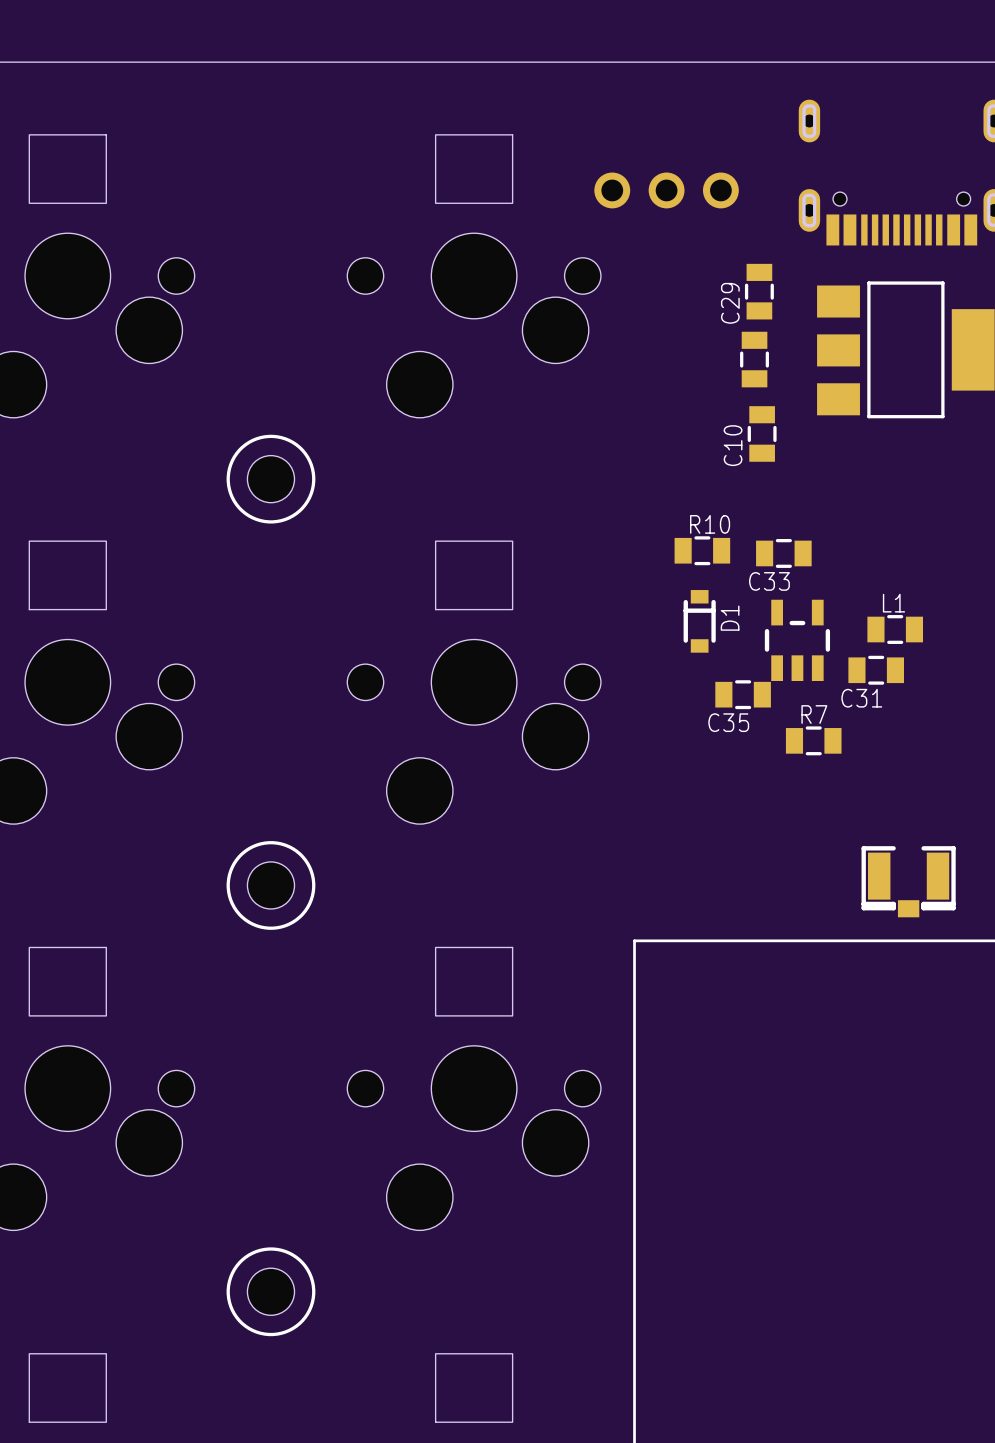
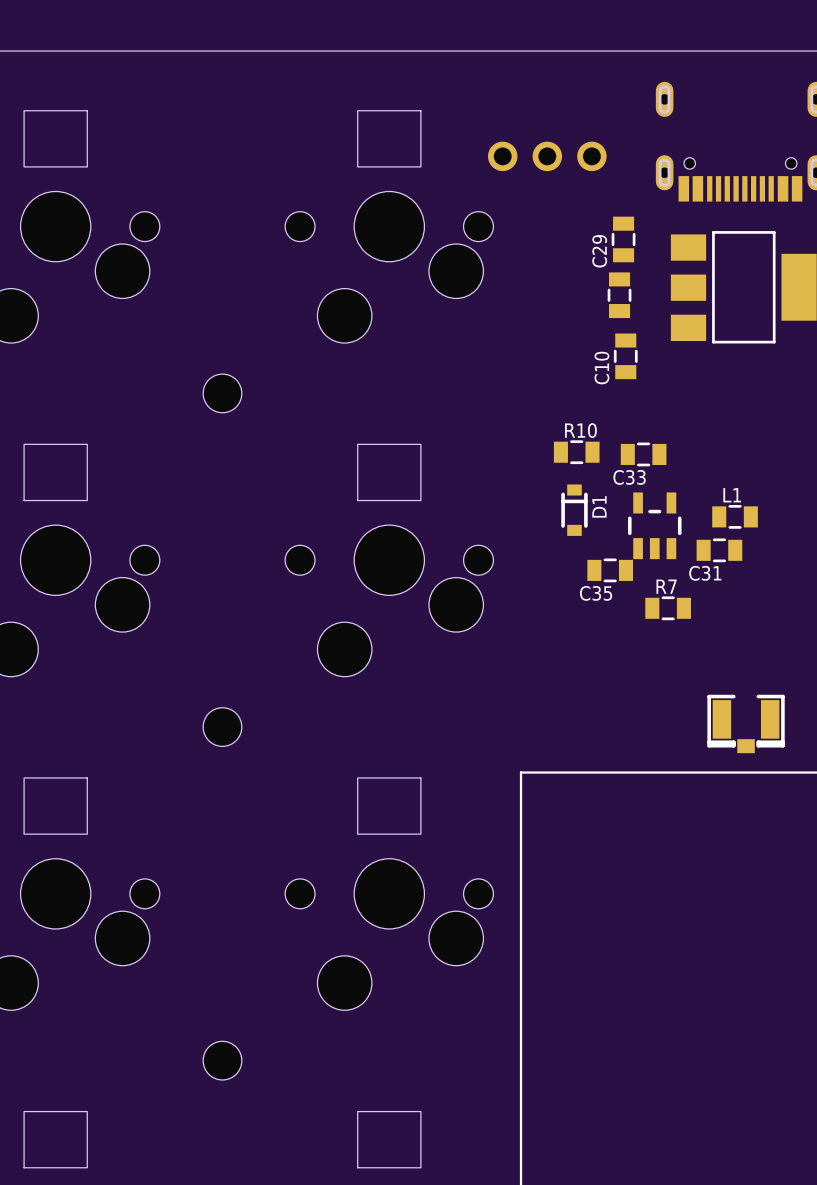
part footprint: [226, 434, 316, 524] -> [203, 374, 242, 413]
part footprint: [226, 841, 316, 930] -> [203, 707, 242, 747]
part footprint: [226, 1247, 316, 1337] -> [203, 1041, 242, 1080]

